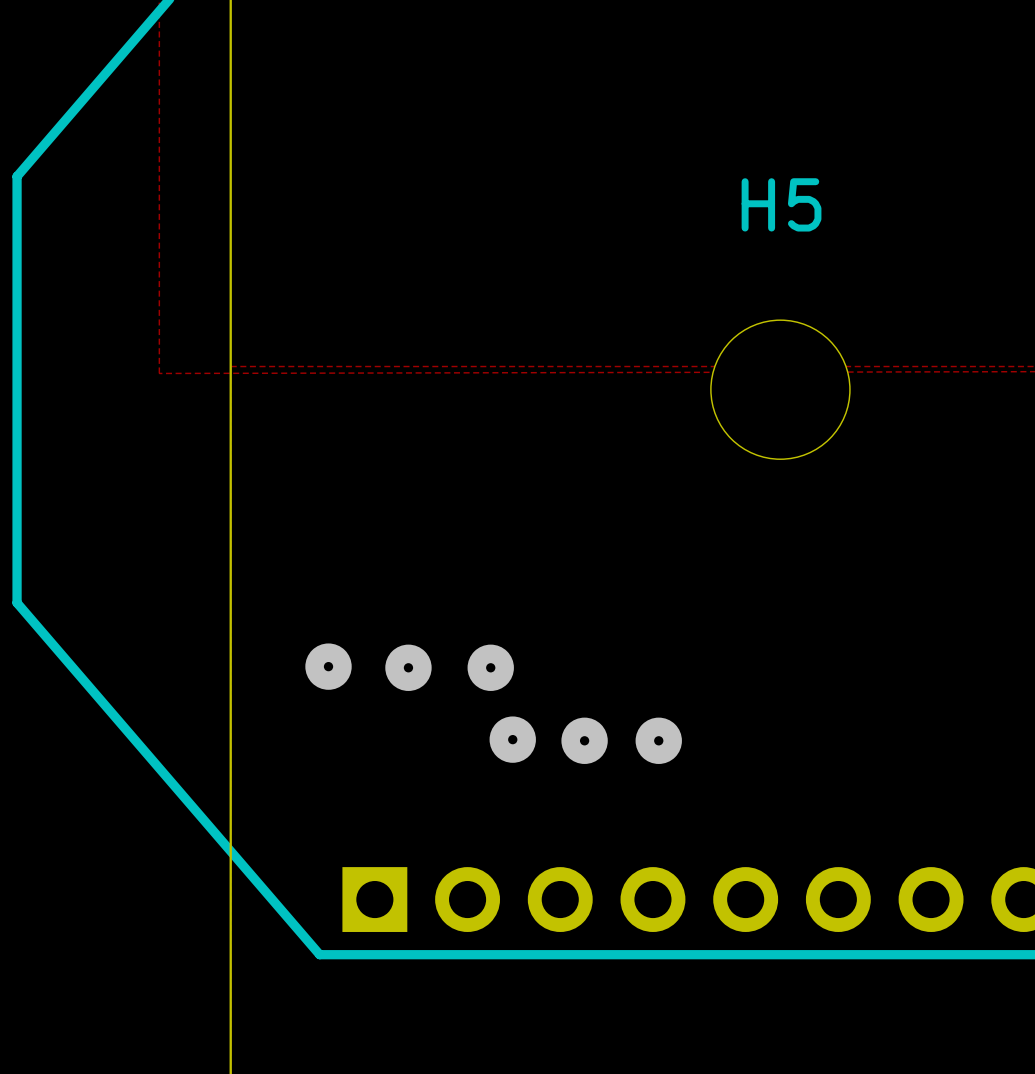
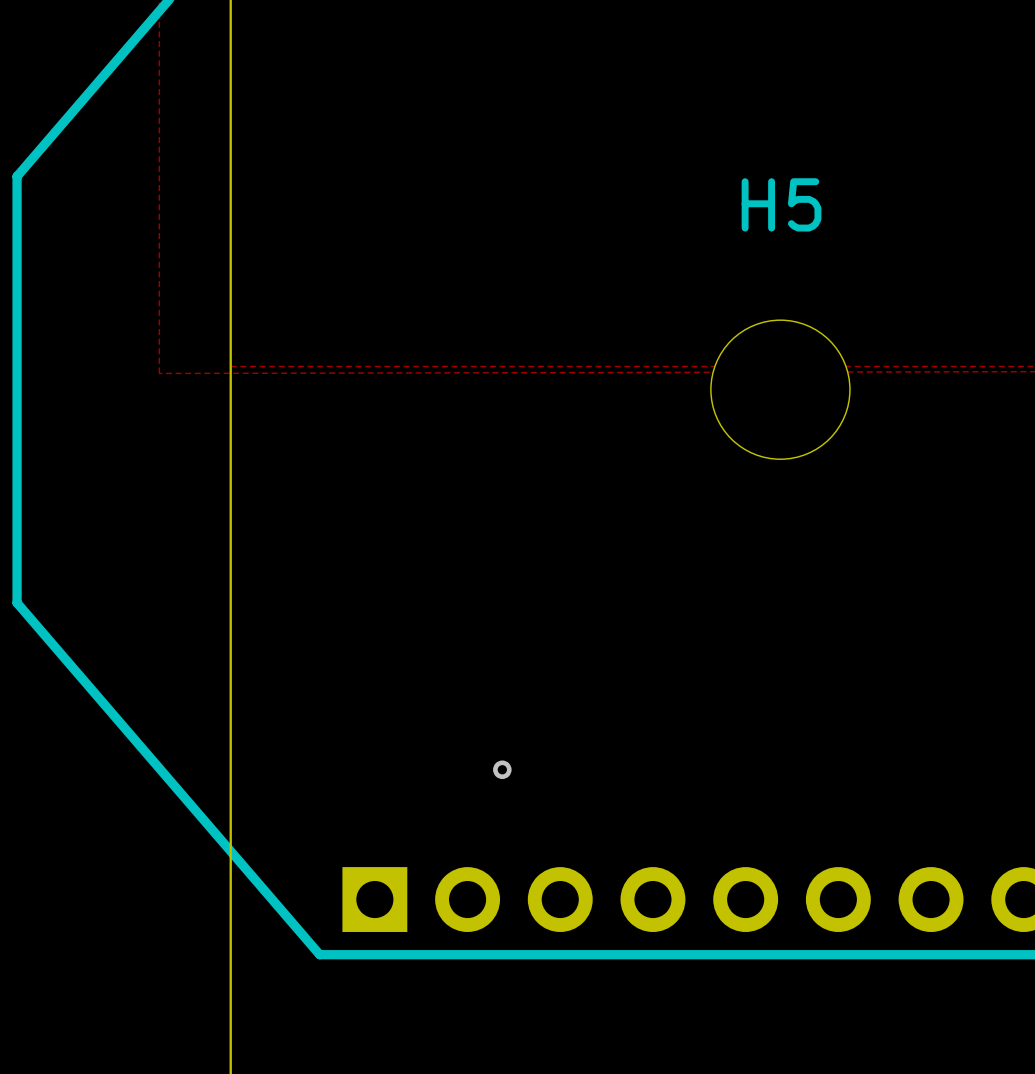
via: (328, 666) -> none
via: (408, 667) -> none
via: (490, 667) -> none
via size: [489, 716, 536, 763] -> [493, 760, 512, 780]
via: (584, 740) -> none
via: (658, 740) -> none

